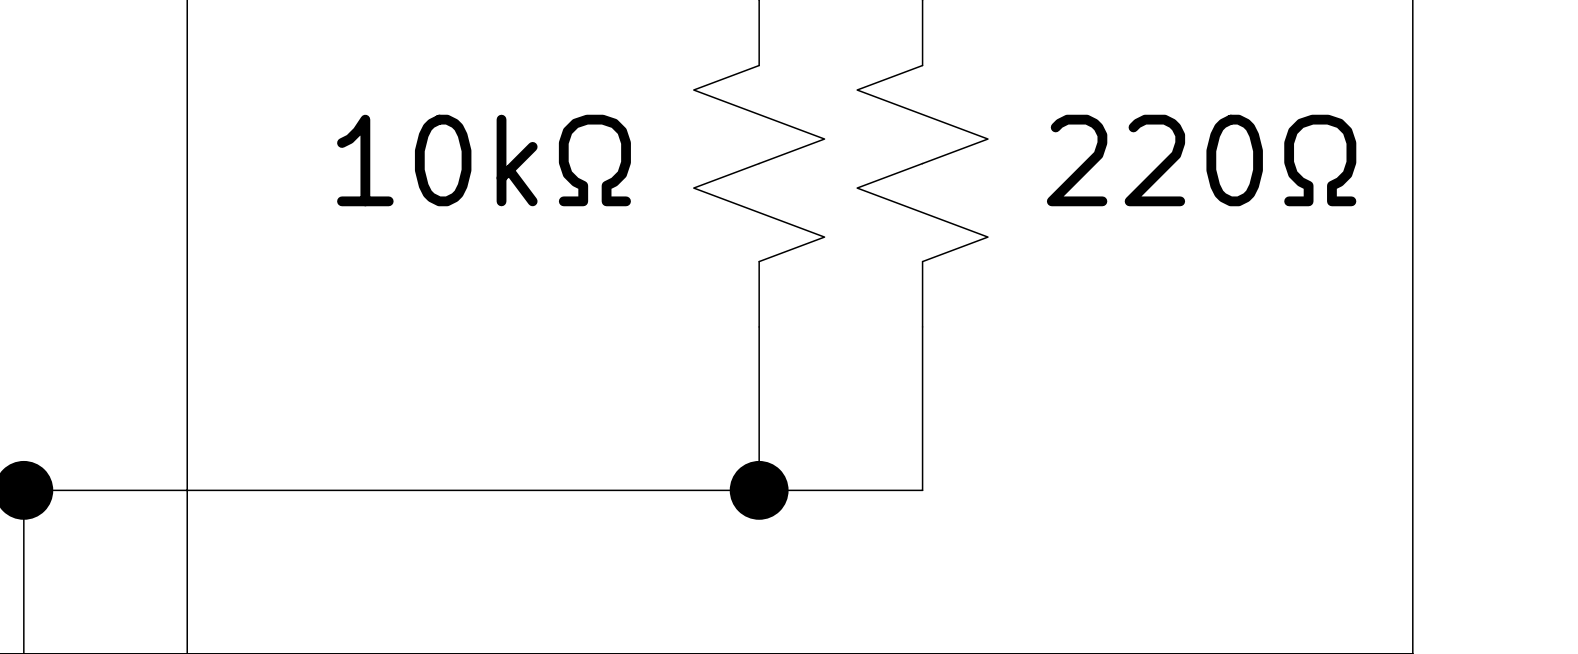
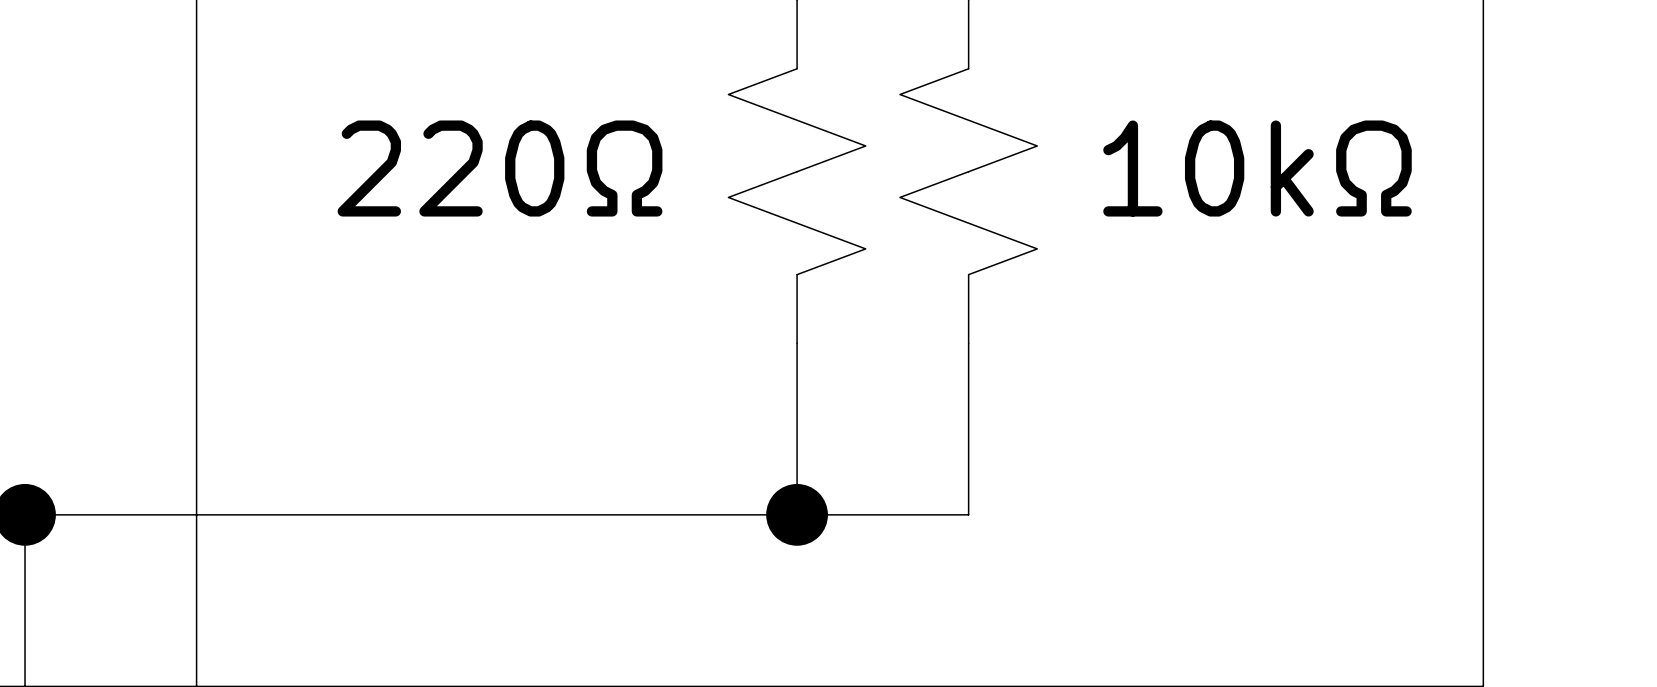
part value: 10kΩ (484, 160) -> 220Ω (500, 168)
part value: 220Ω (1201, 160) -> 10kΩ (1257, 168)

